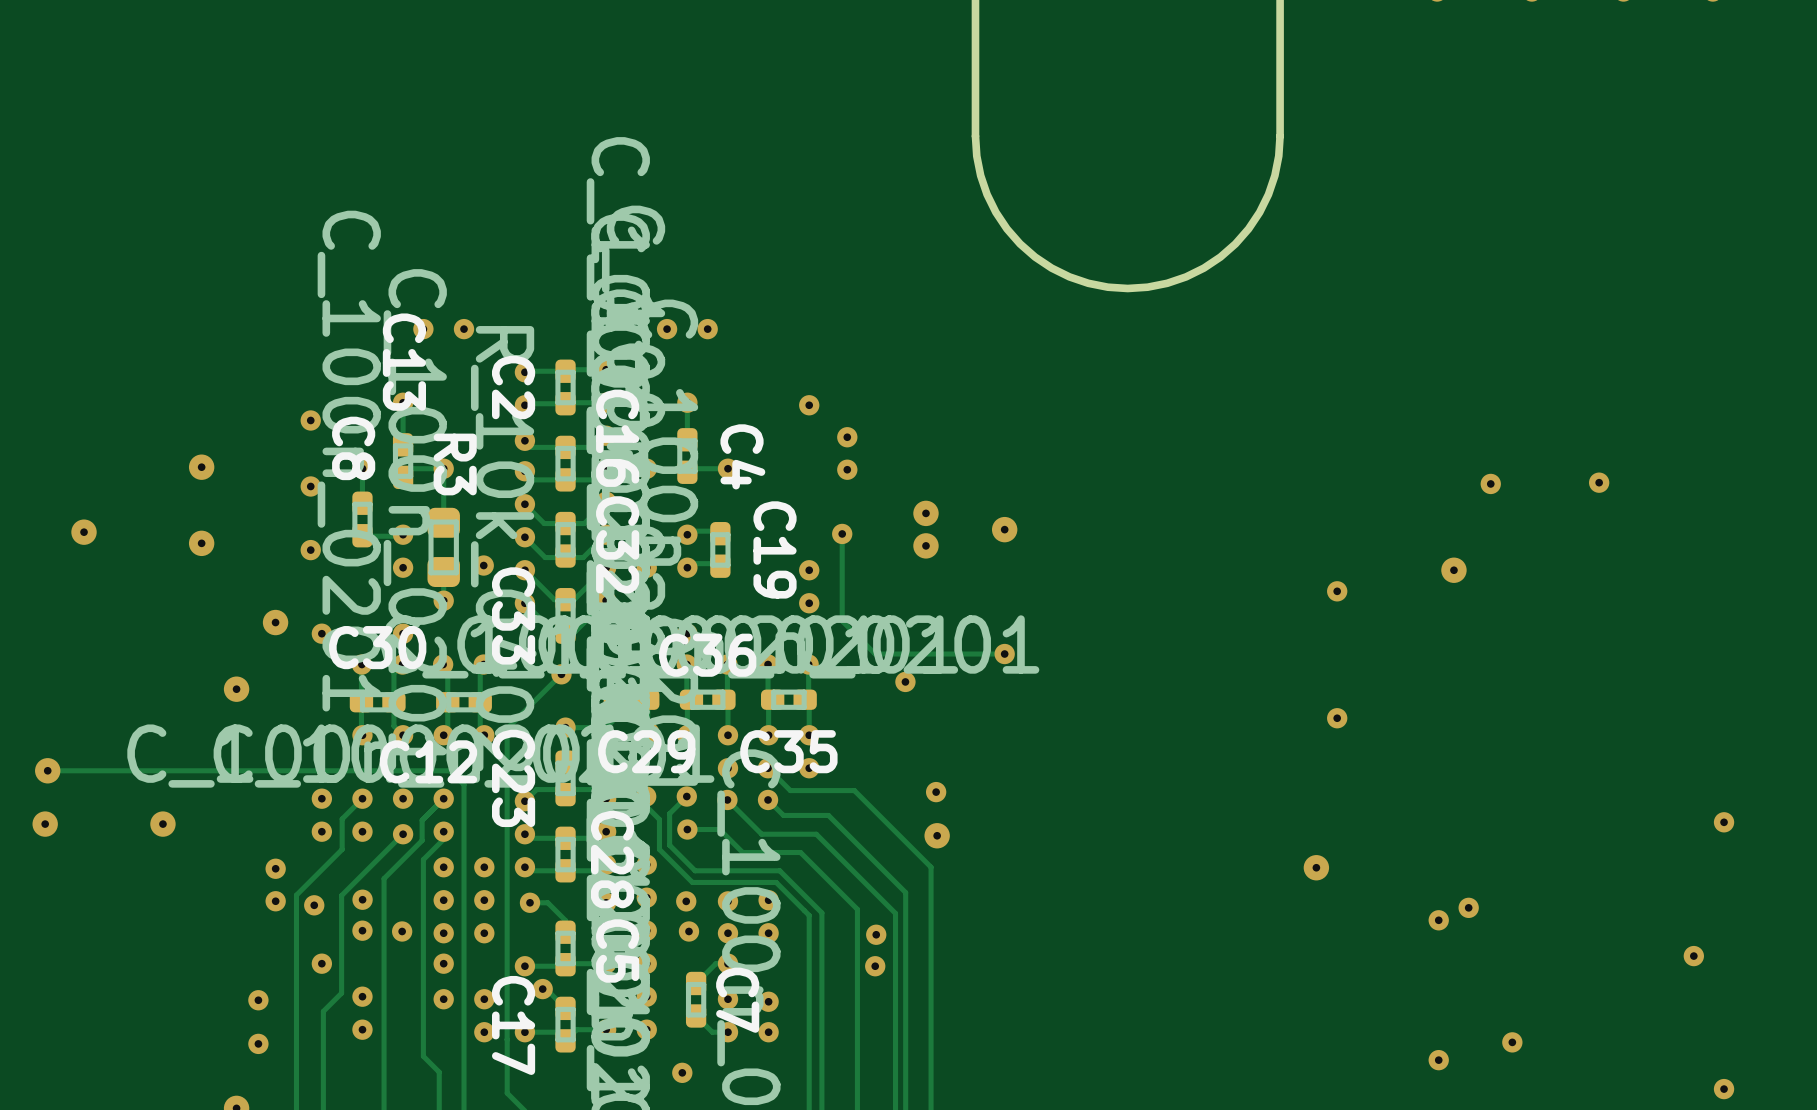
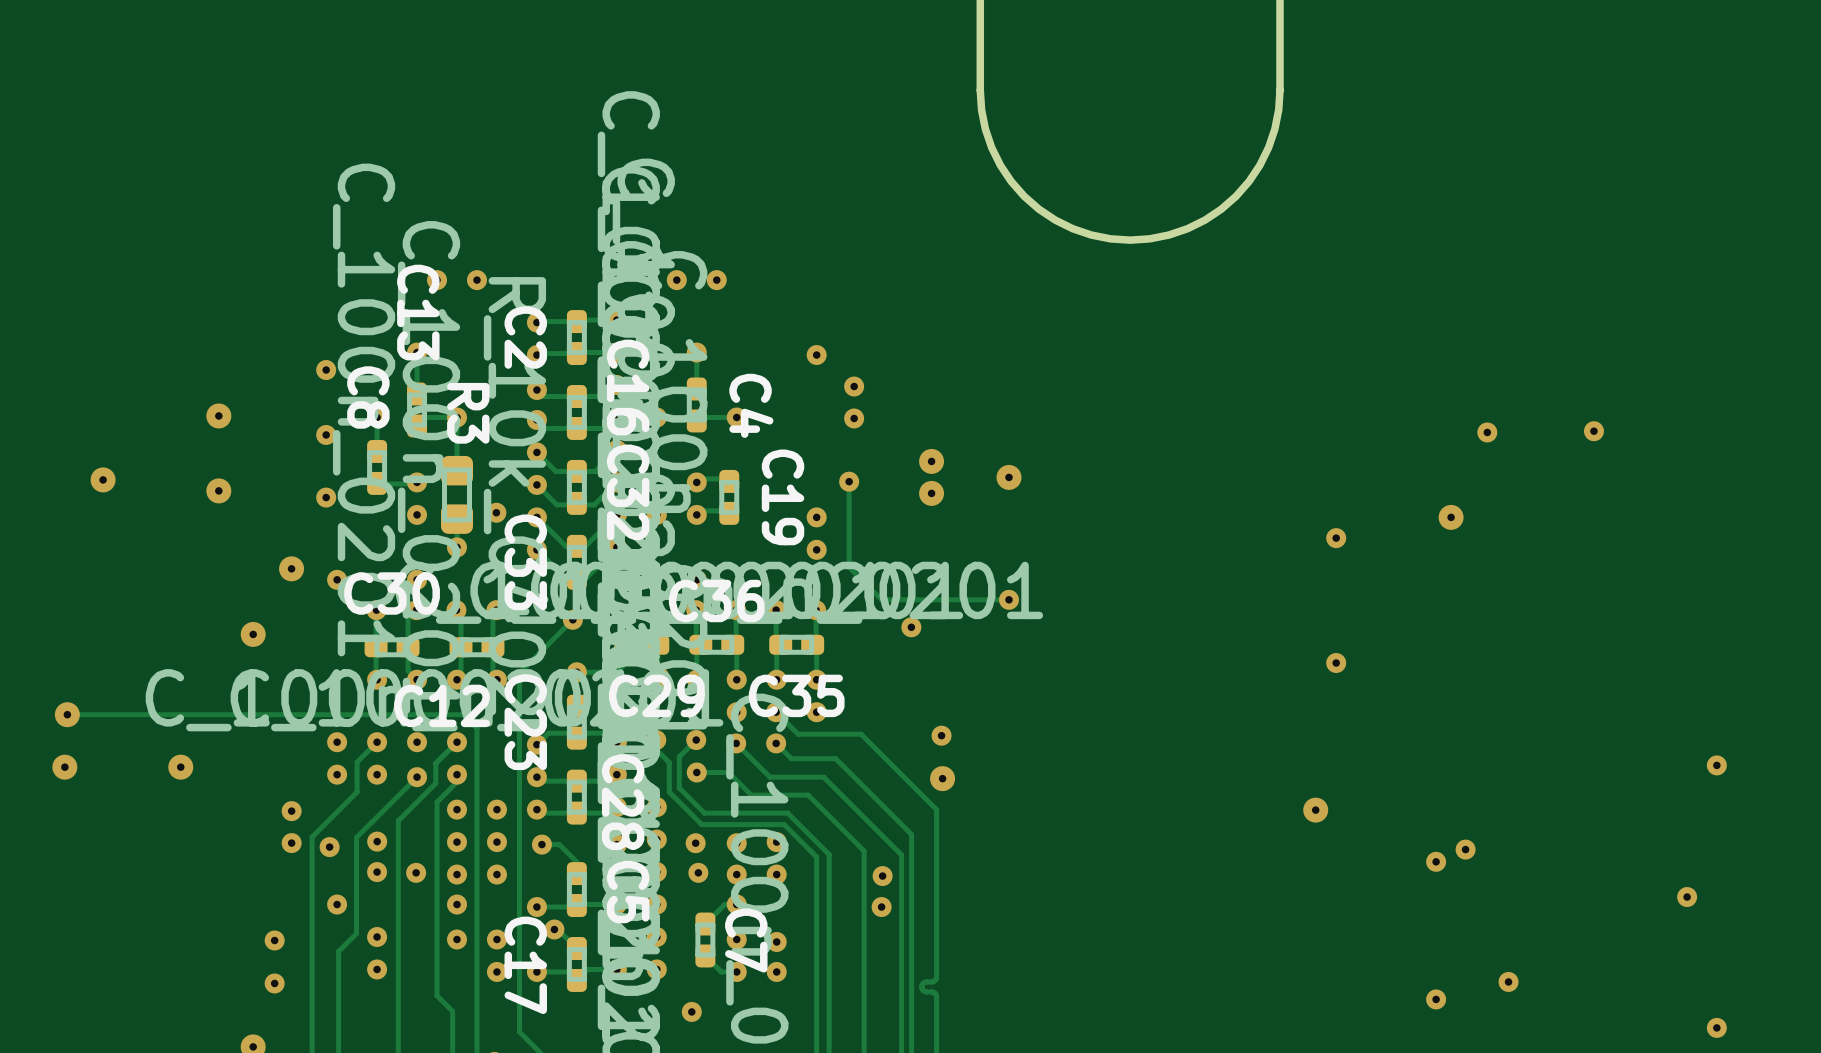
track: (931, 1037) (931, 1057) -> (936, 976) (933, 981) (923, 983) (921, 986) (924, 991) (934, 993) (936, 996)

